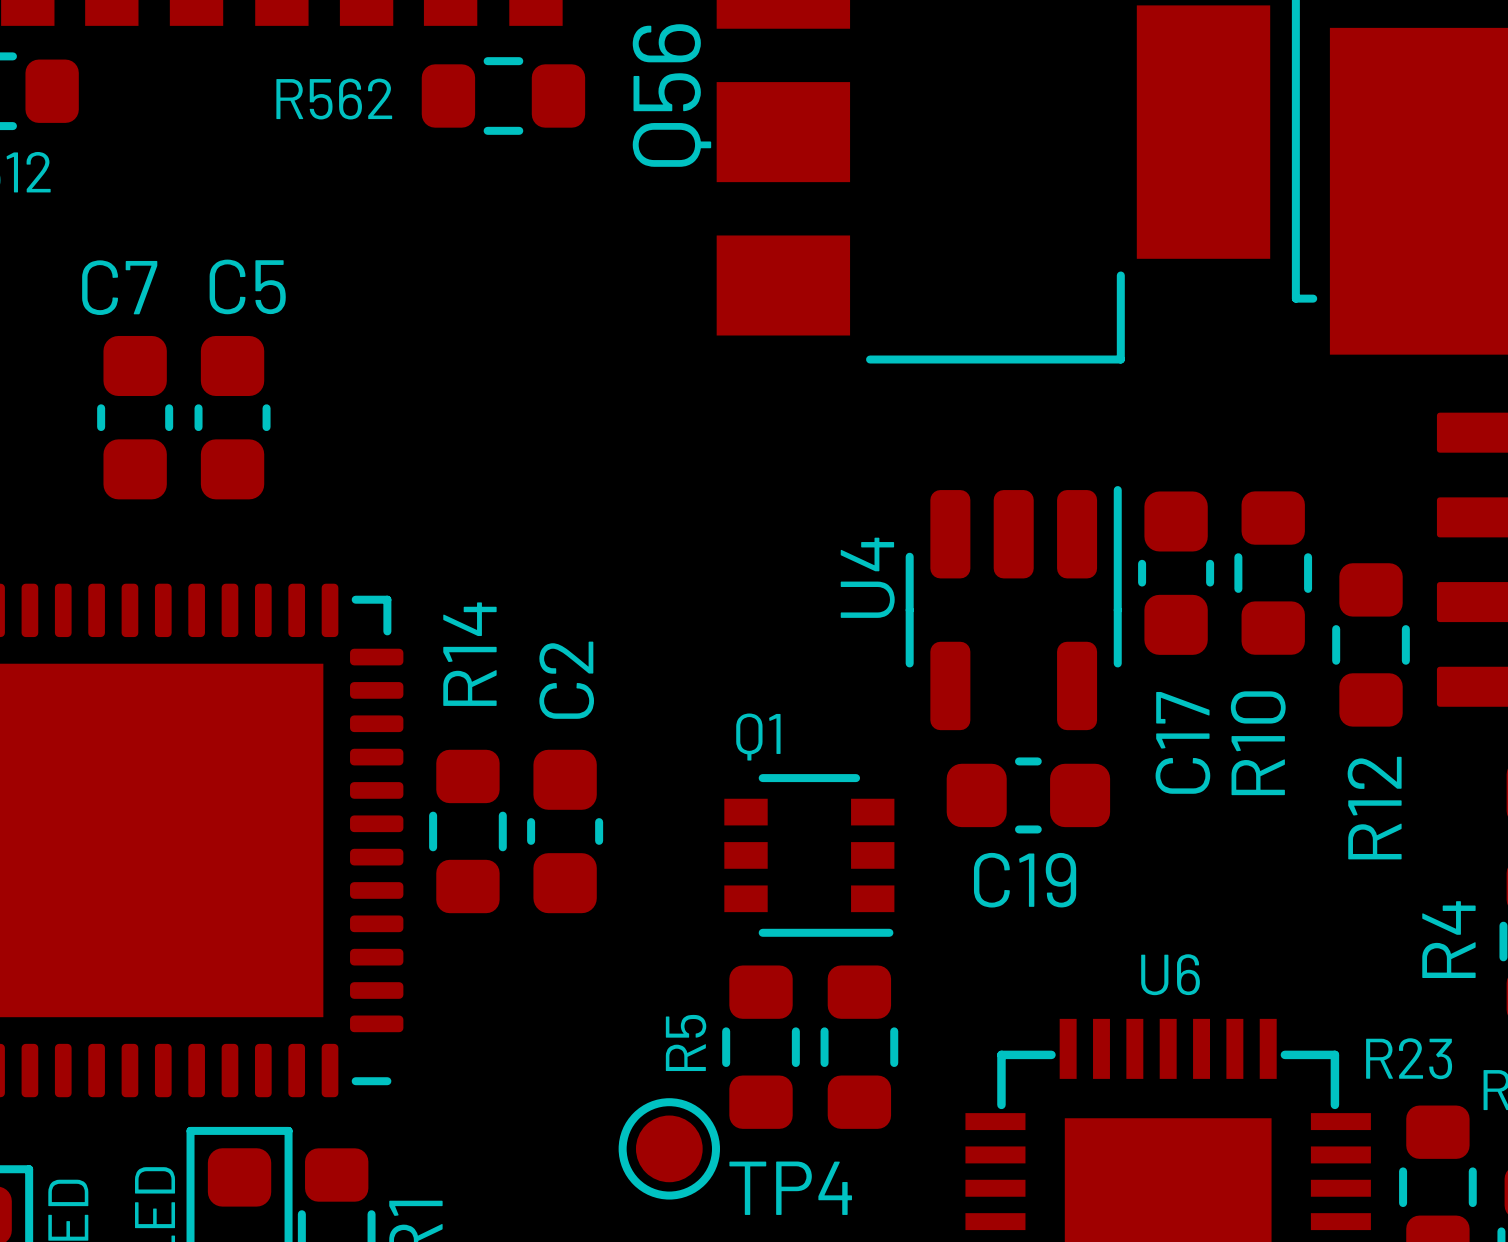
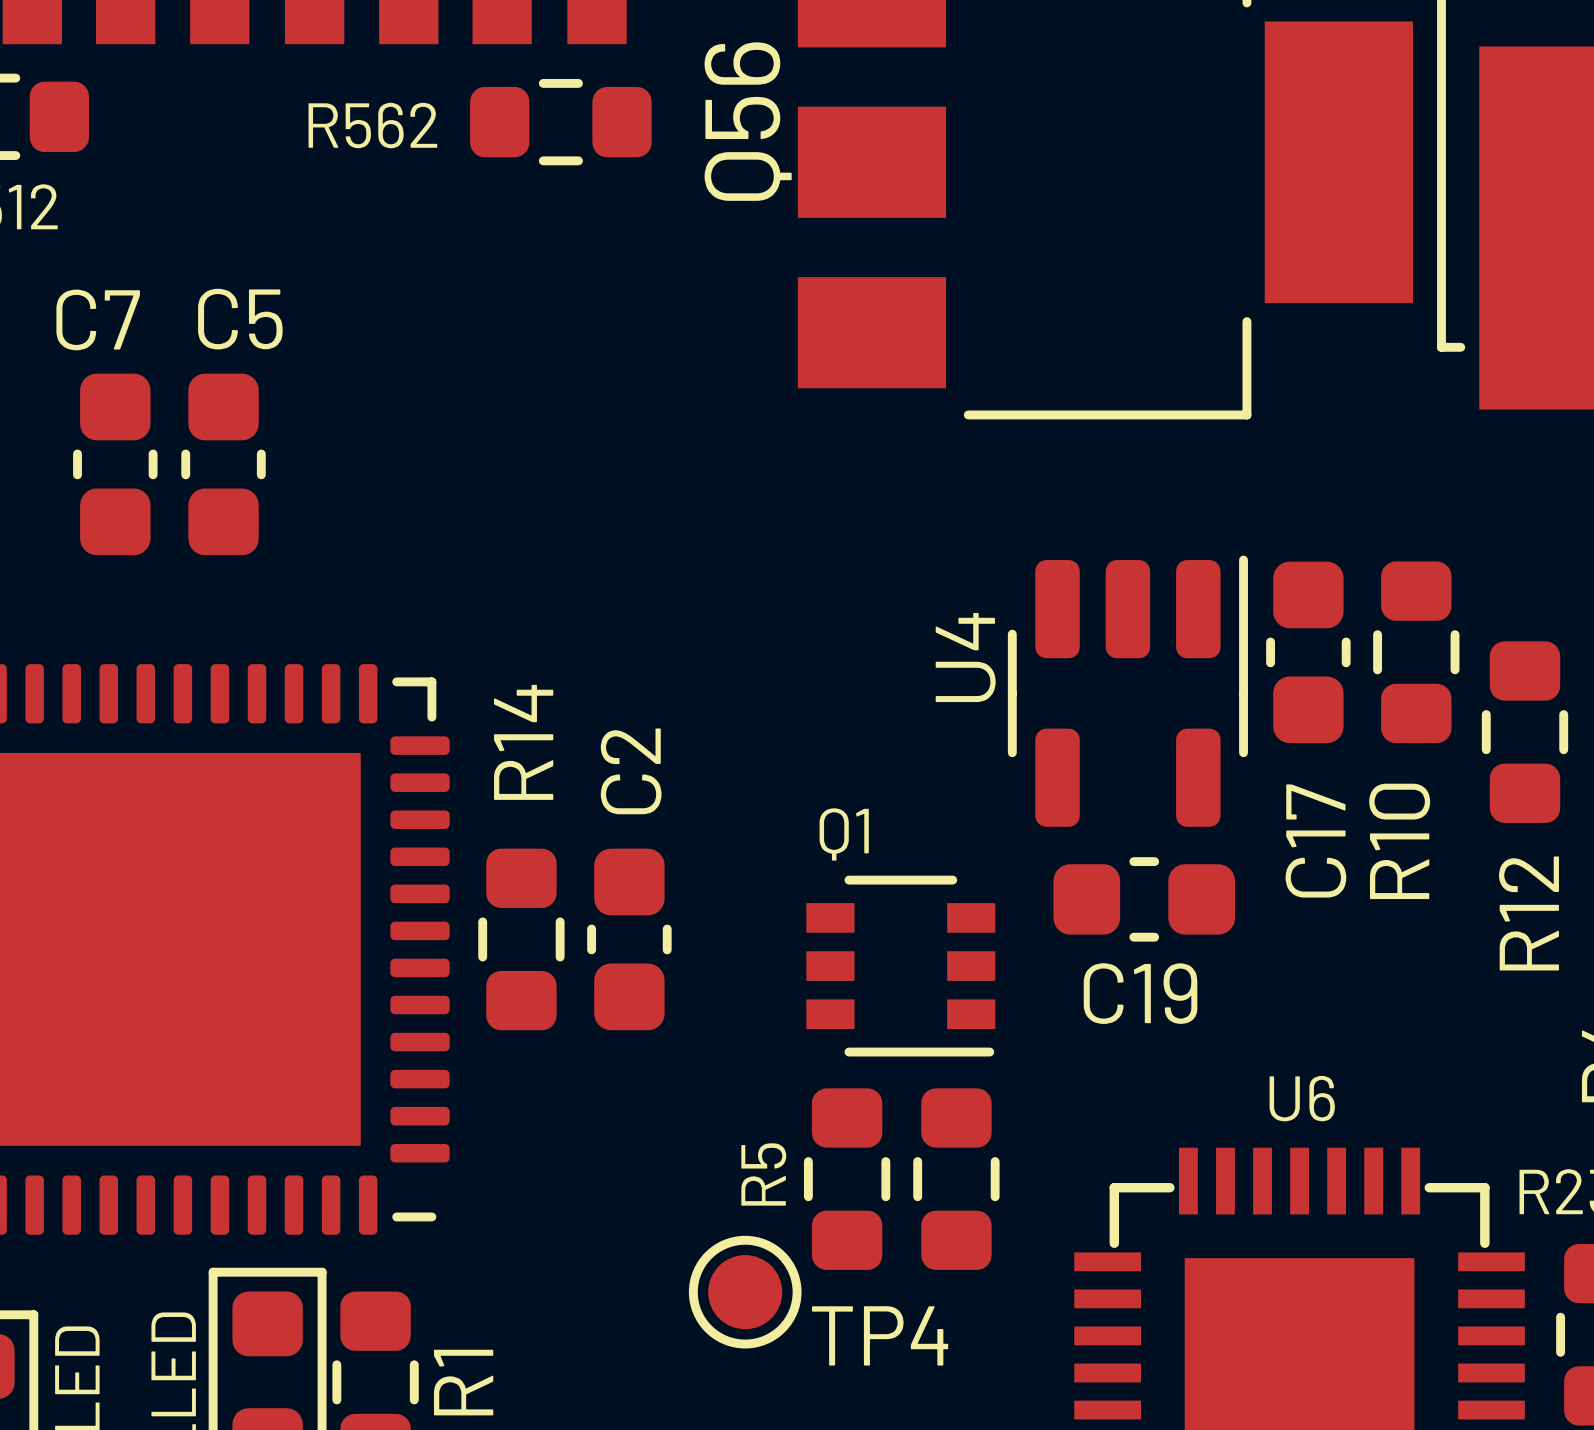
C7 position: (135, 417) -> (115, 464)
C5 position: (232, 417) -> (223, 464)

